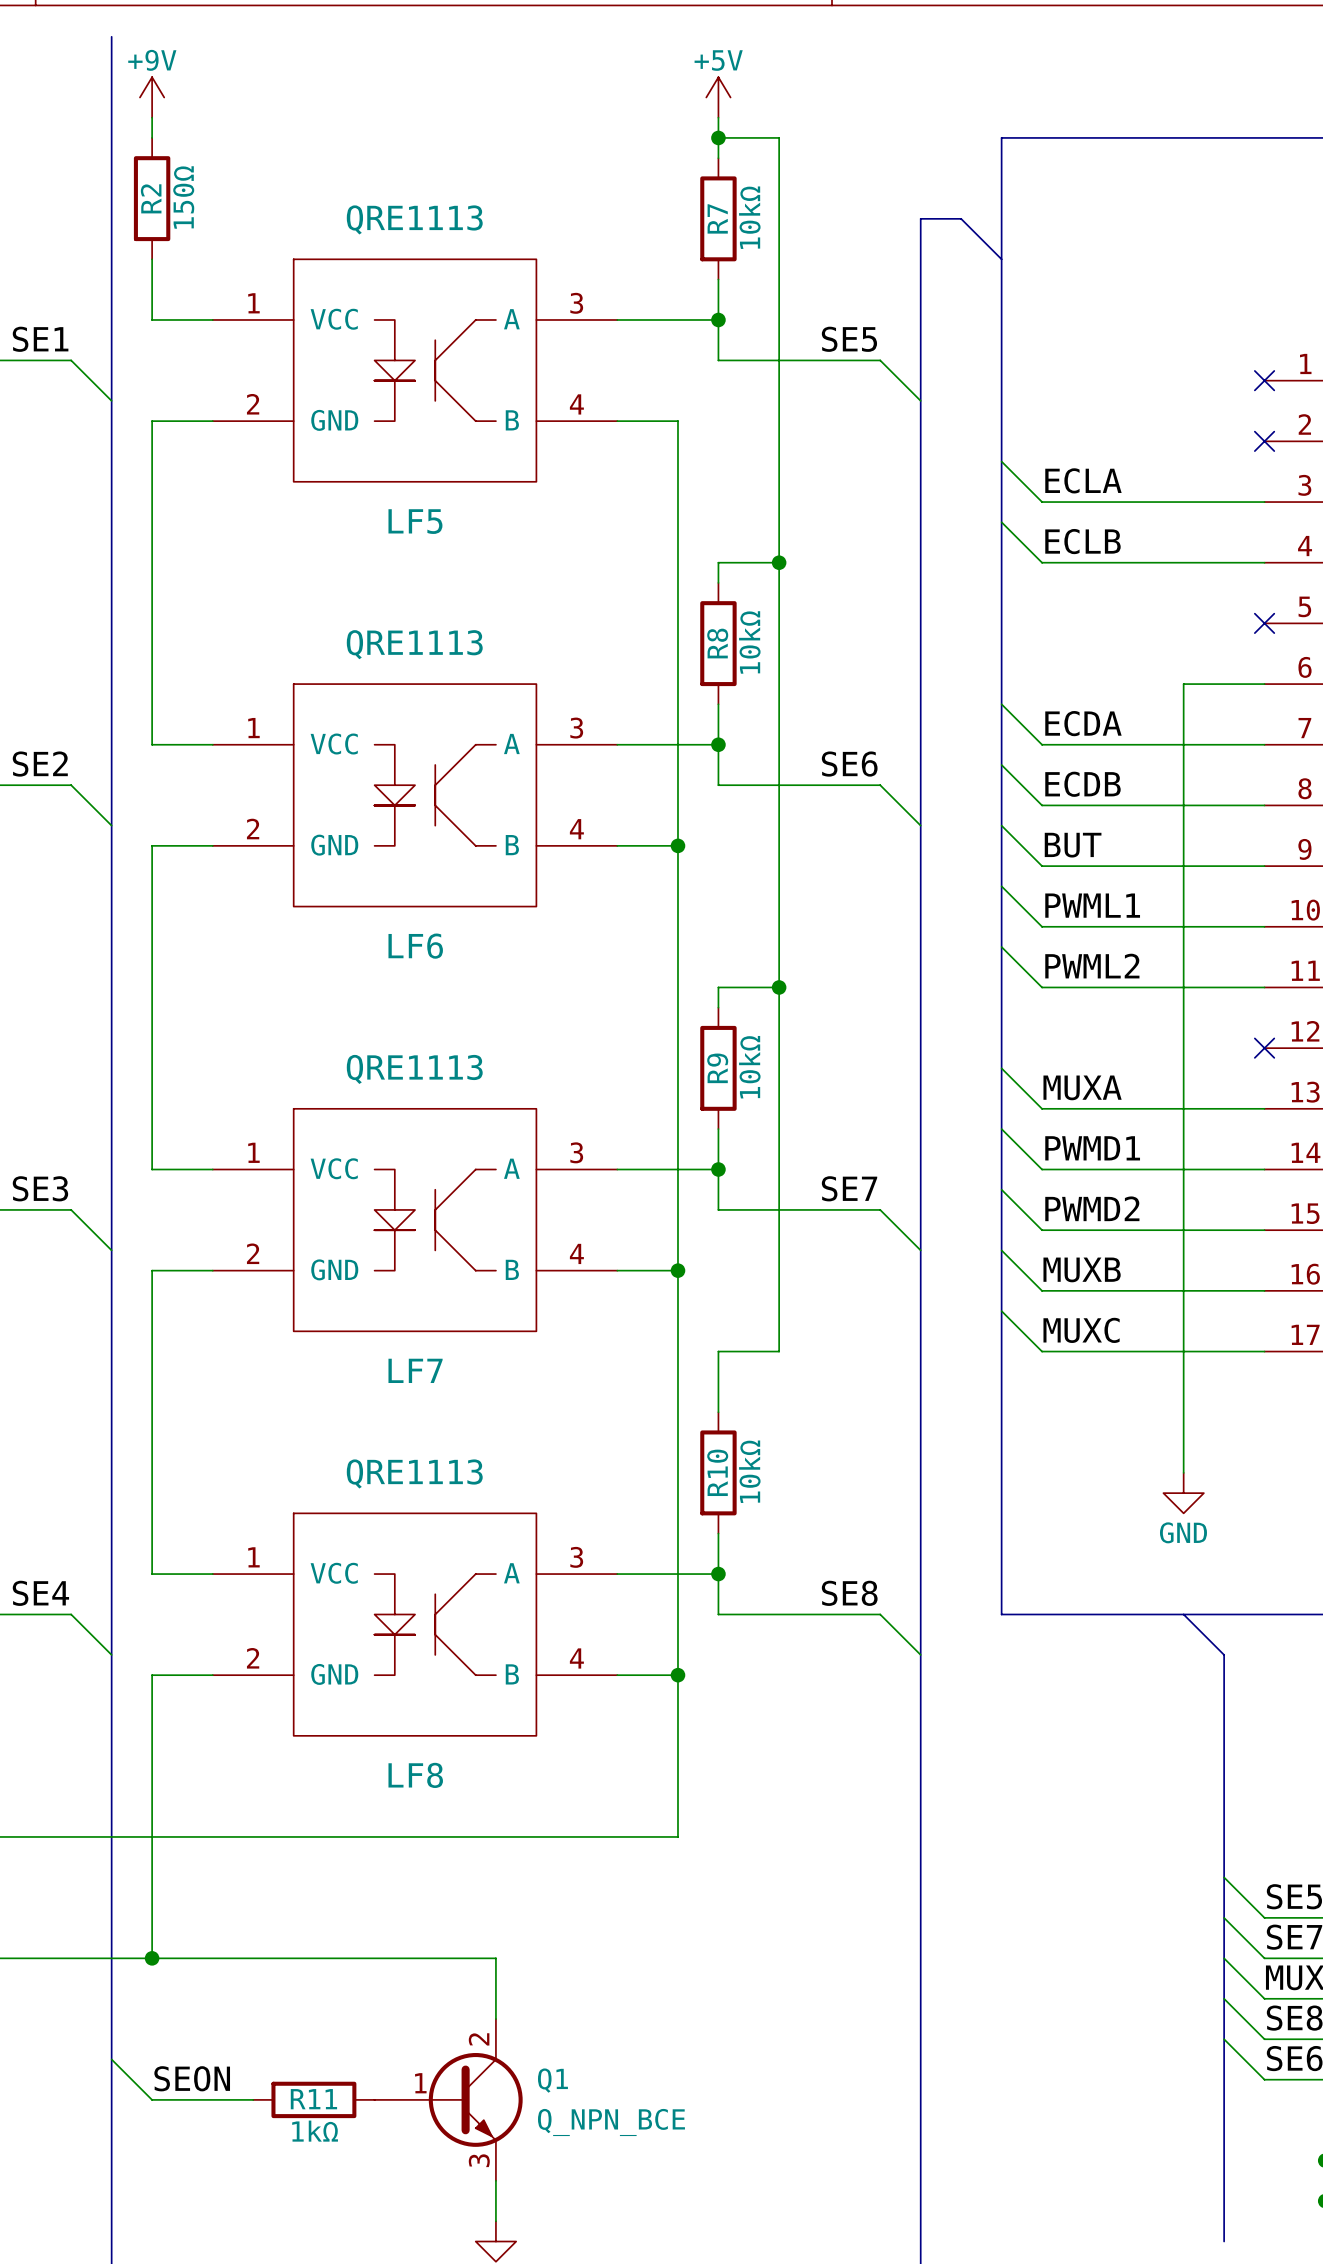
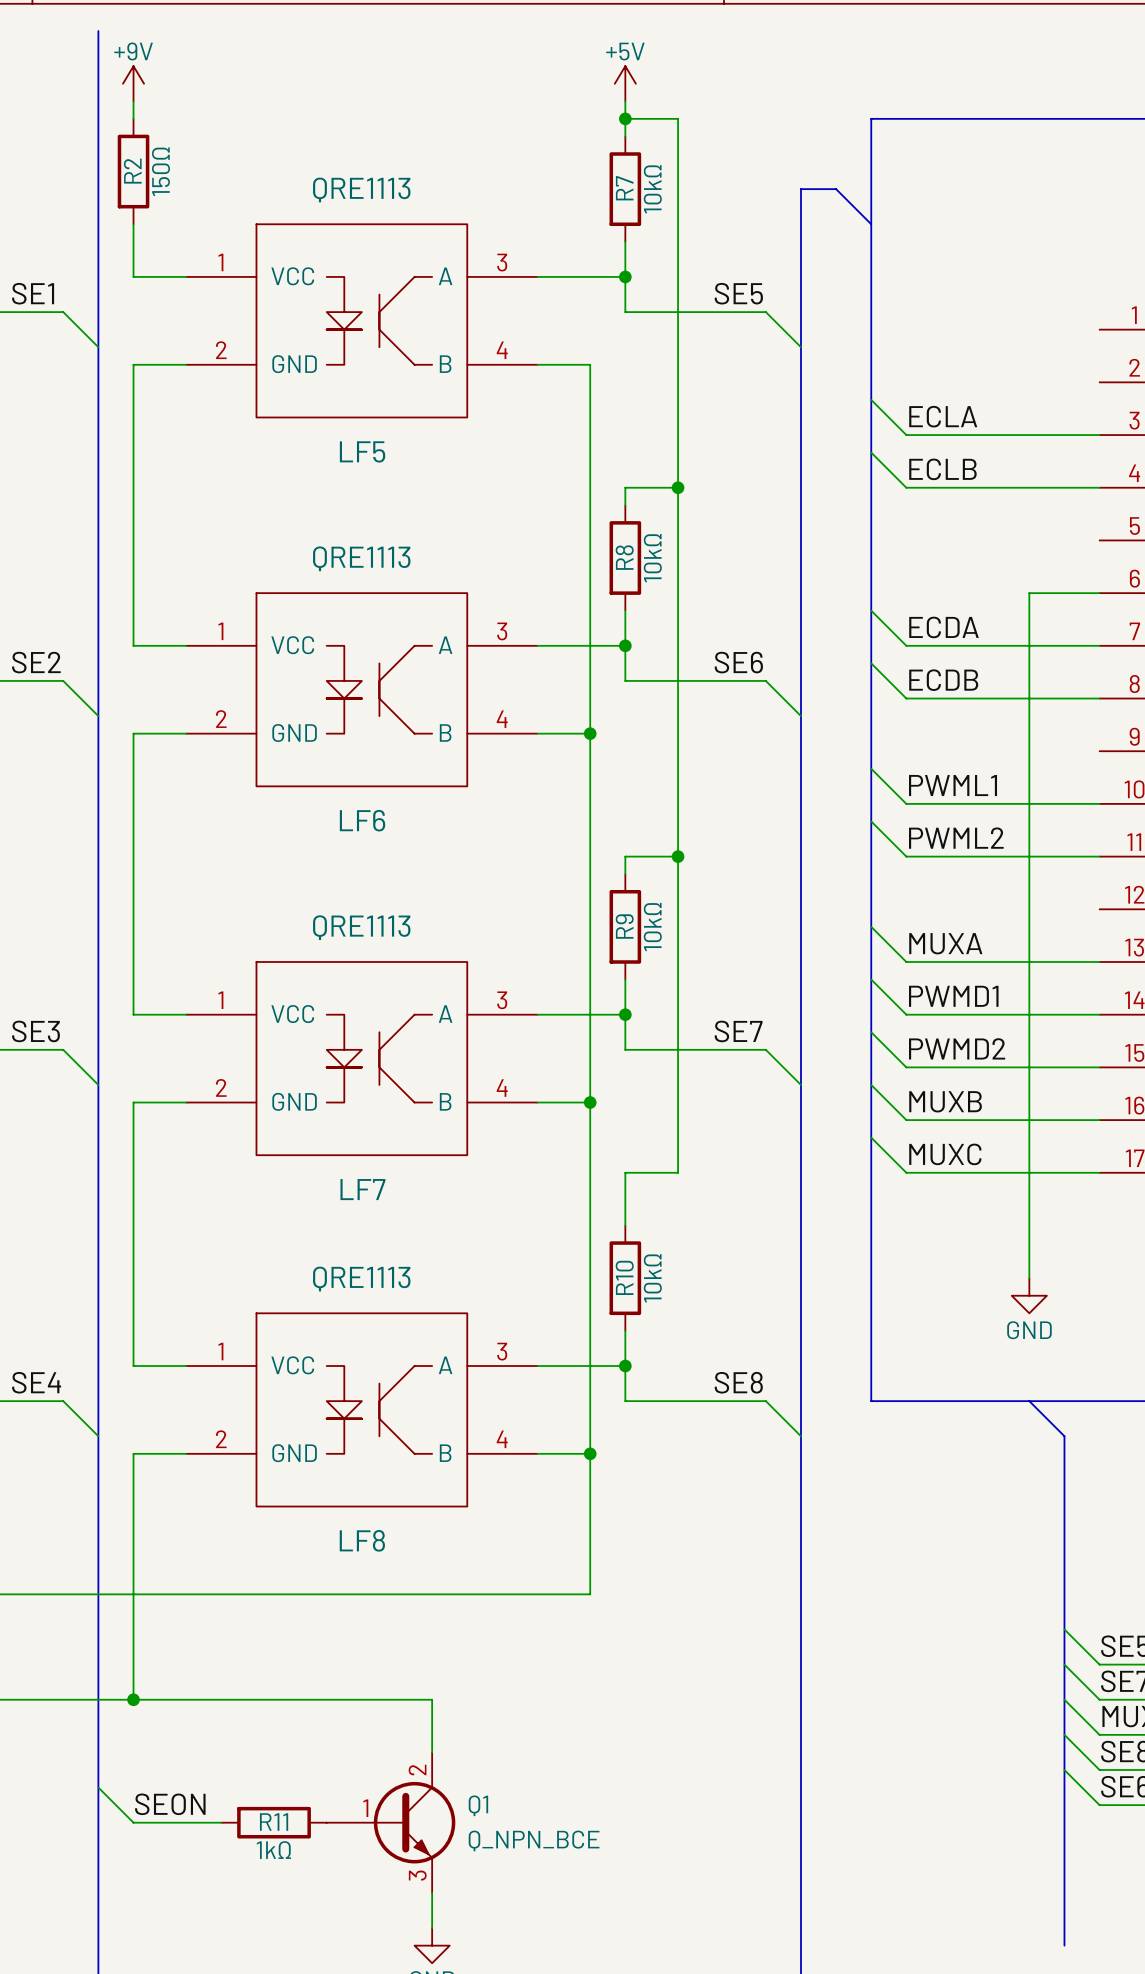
no-connect mark: (1264, 380) -> none
no-connect mark: (1264, 441) -> none
no-connect mark: (1264, 623) -> none
wire: (1001, 825) (1042, 866) (1264, 866) -> none
label: BUT (1073, 845) -> none
no-connect mark: (1264, 1048) -> none

